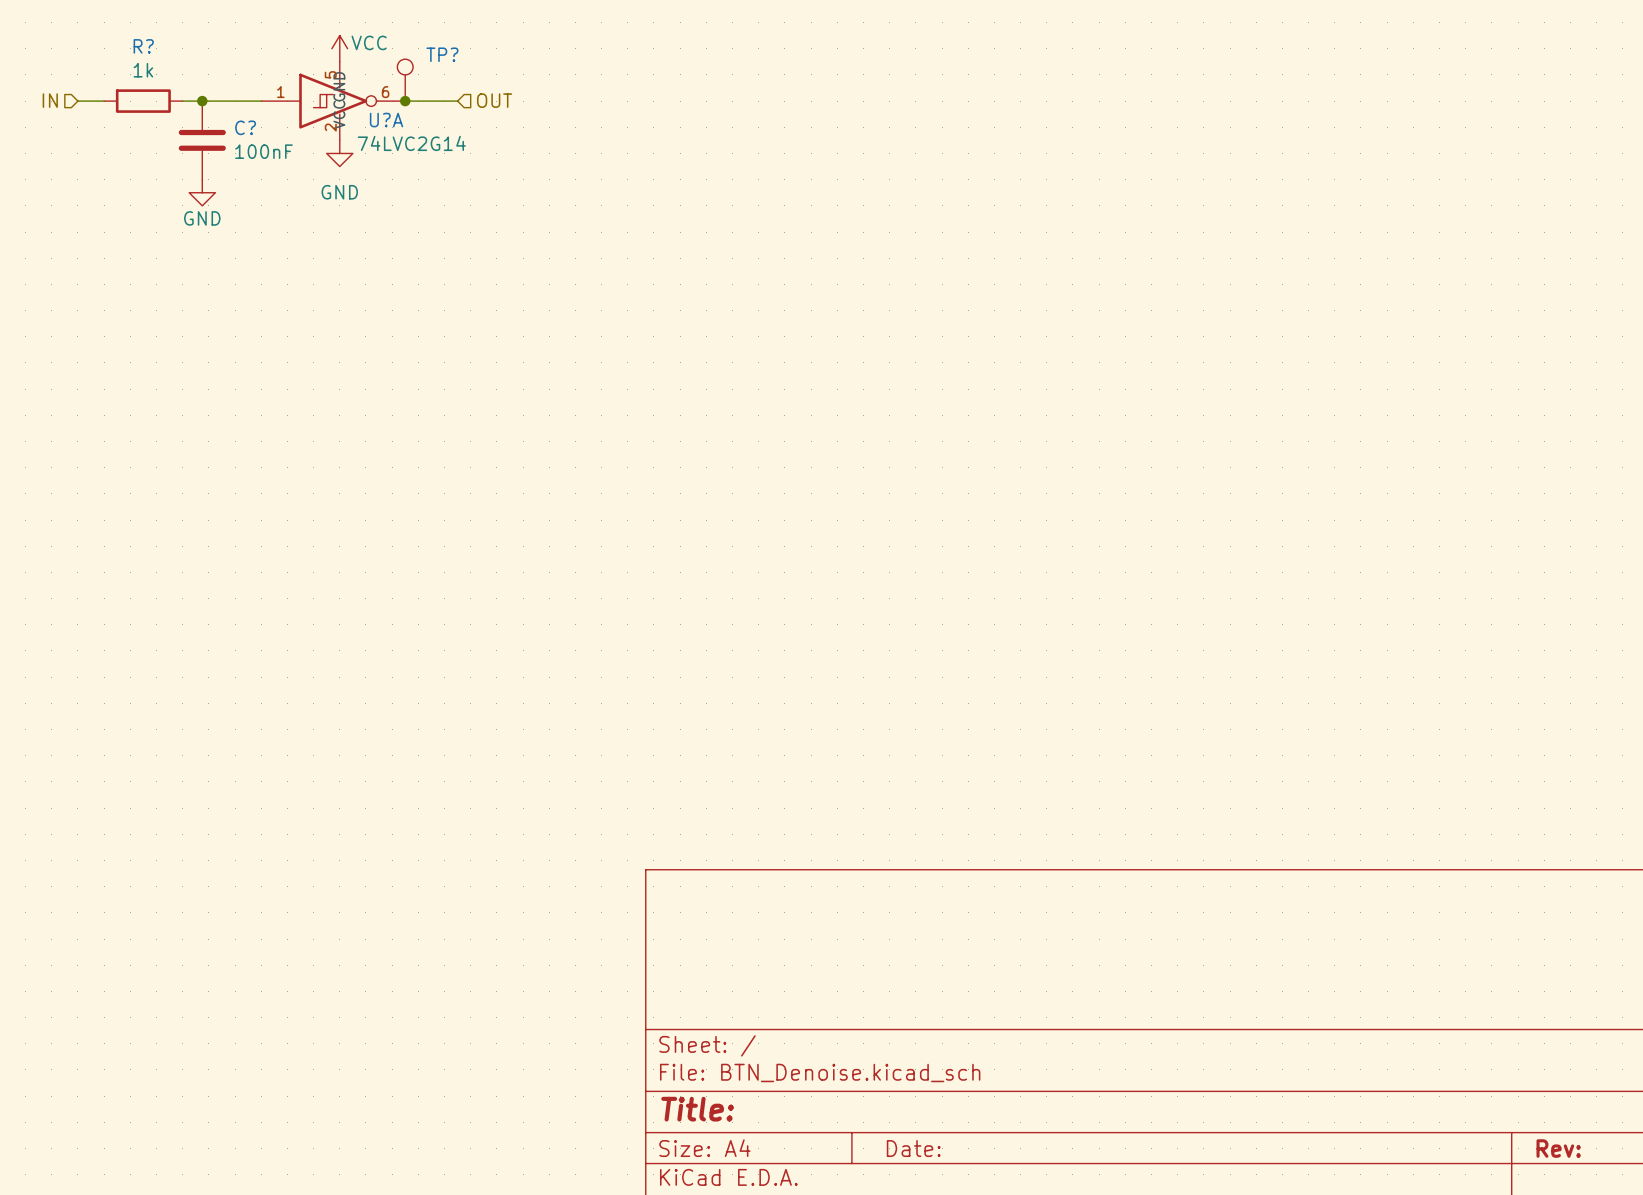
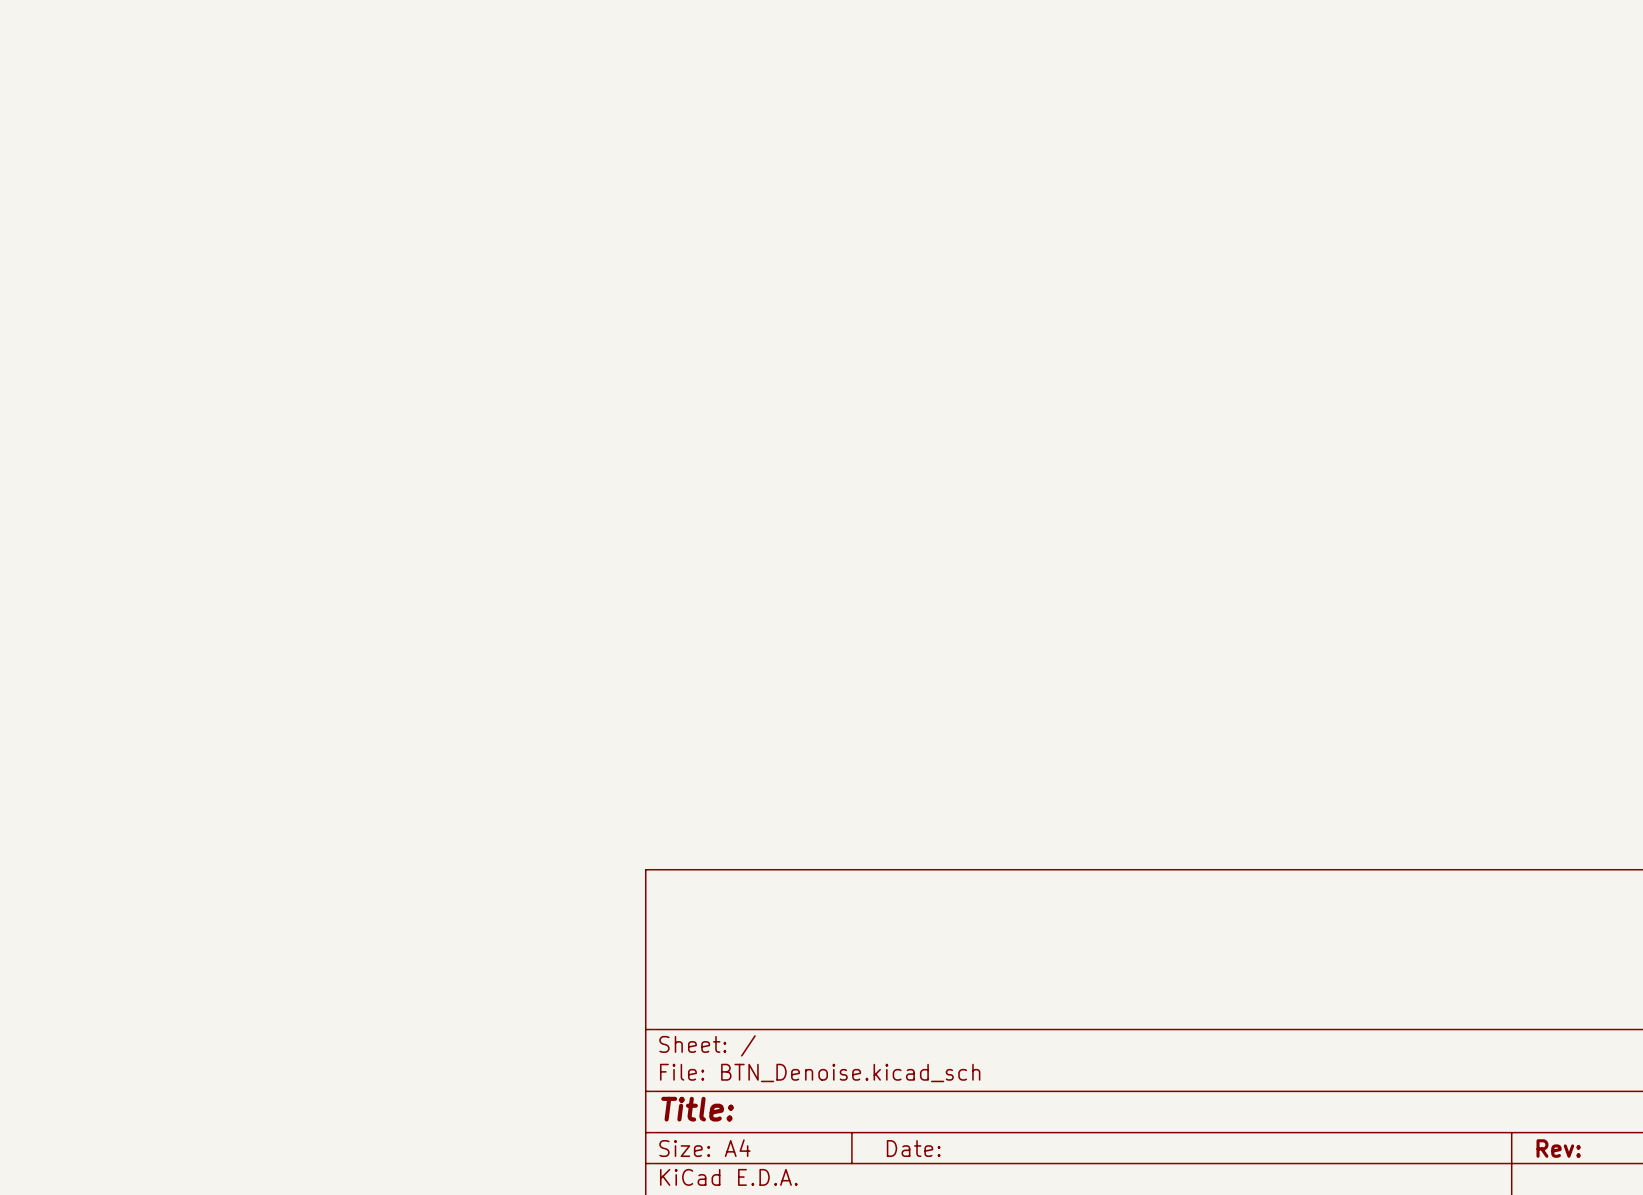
power symbol: VCC (339, 48) -> none
TP?: (405, 80) -> none
hierarchical label: IN (50, 100) -> none
hierarchical label: OUT (494, 100) -> none
wire: (77, 101) (104, 101) -> none
R?: 1k (143, 101) -> none
wire: (182, 101) (261, 101) -> none
junction: (202, 101) -> none
U?A: 74LVC2G14 (333, 101) -> none
wire: (405, 101) (457, 101) -> none
junction: (405, 101) -> none
C?: 100nF (202, 140) -> none
power symbol: GND (339, 153) -> none
power symbol: GND (202, 192) -> none

